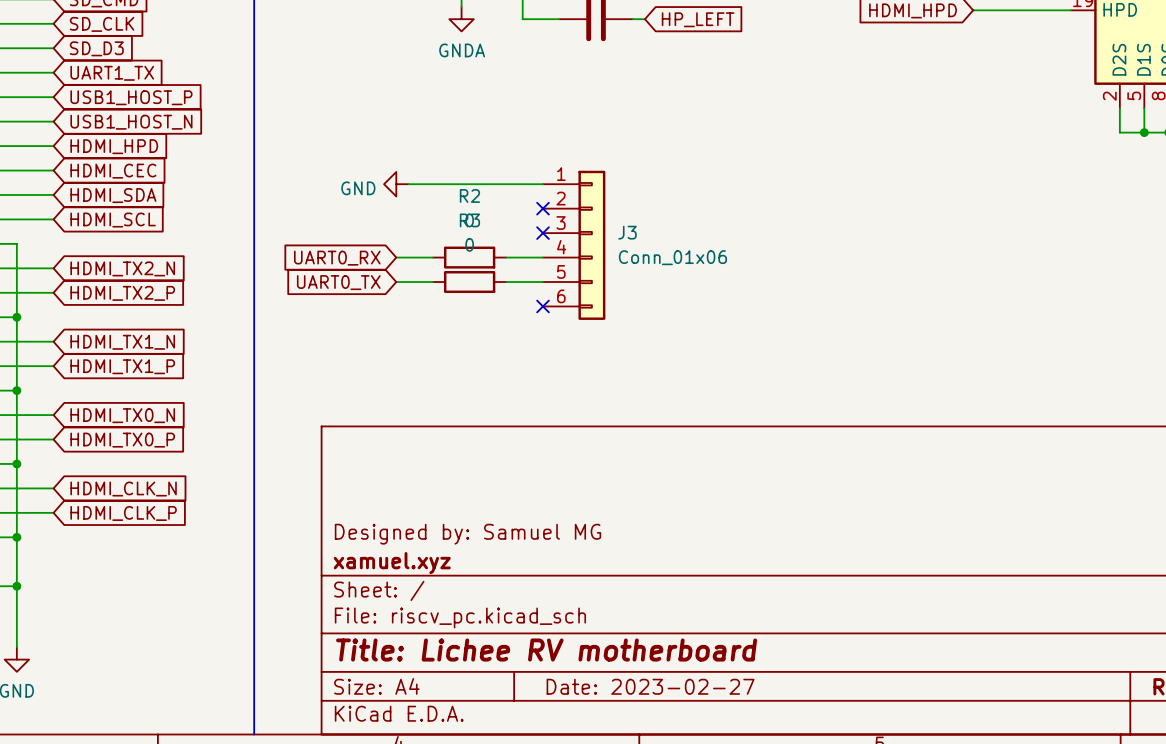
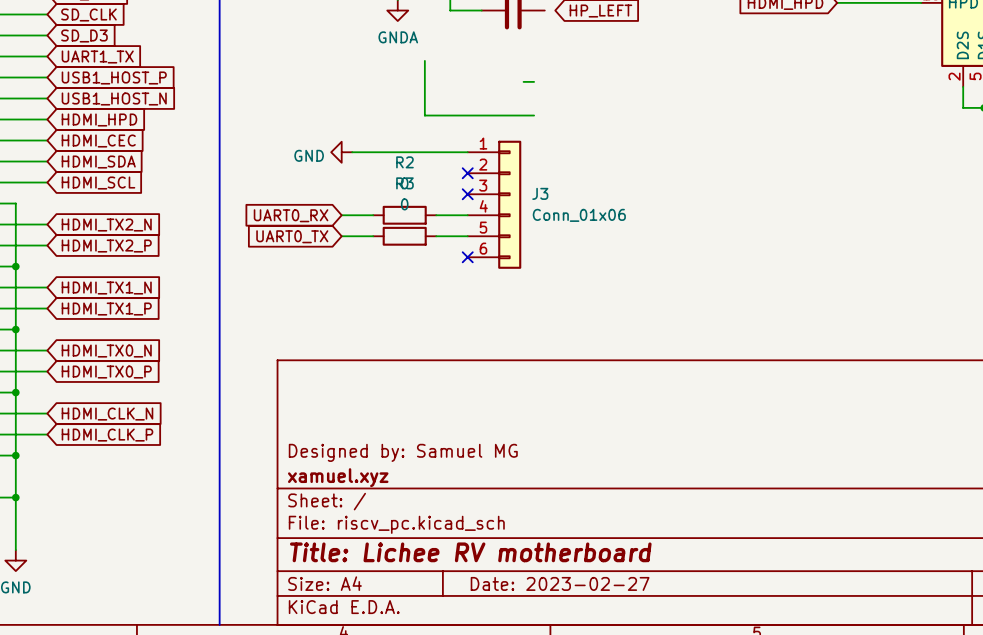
wire: (632, 19) (644, 19) -> (523, 81) (534, 81)
wire: none -> (424, 60) (424, 115) (534, 115)

